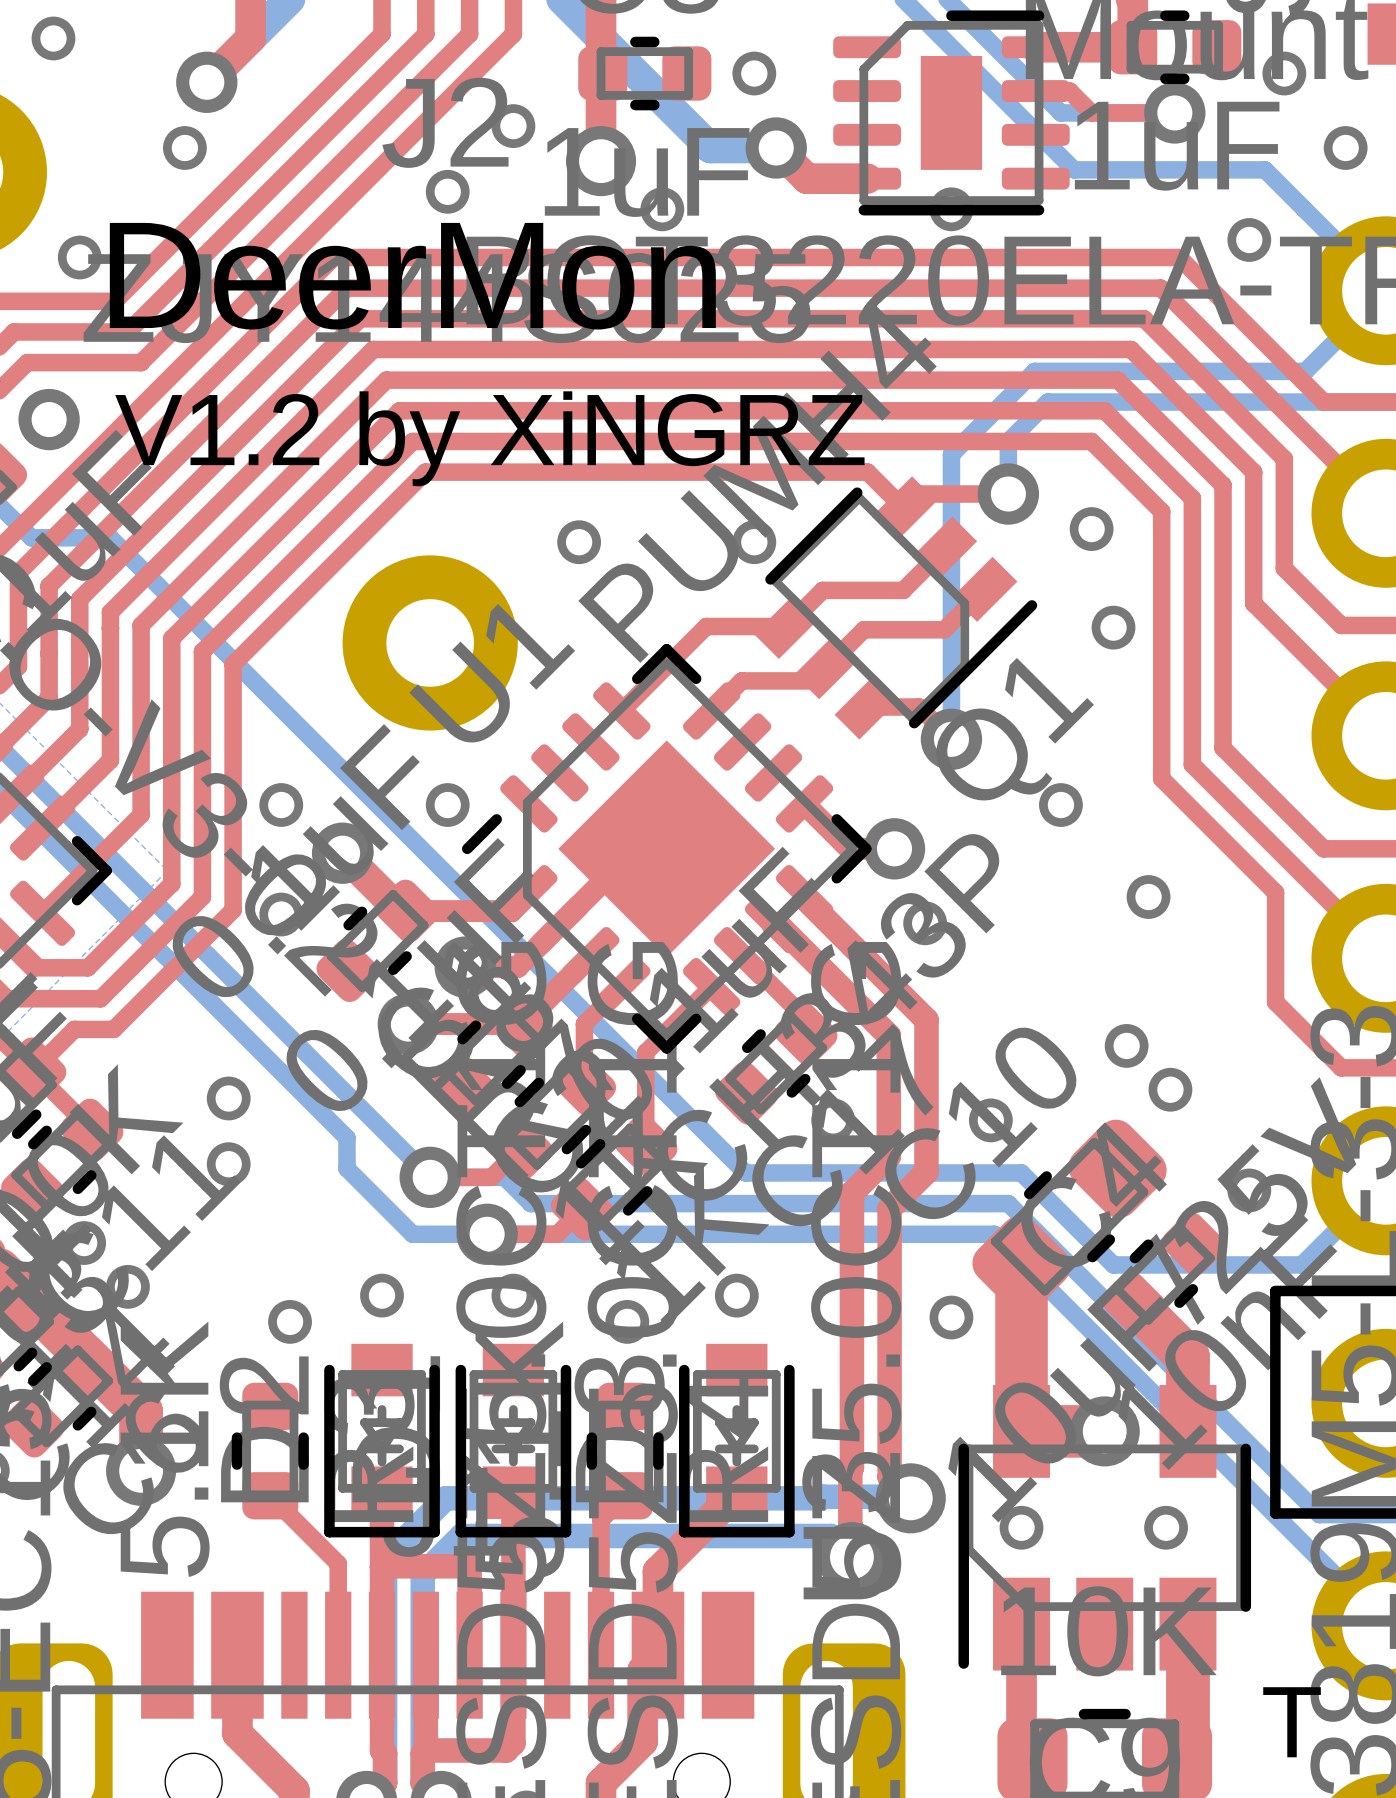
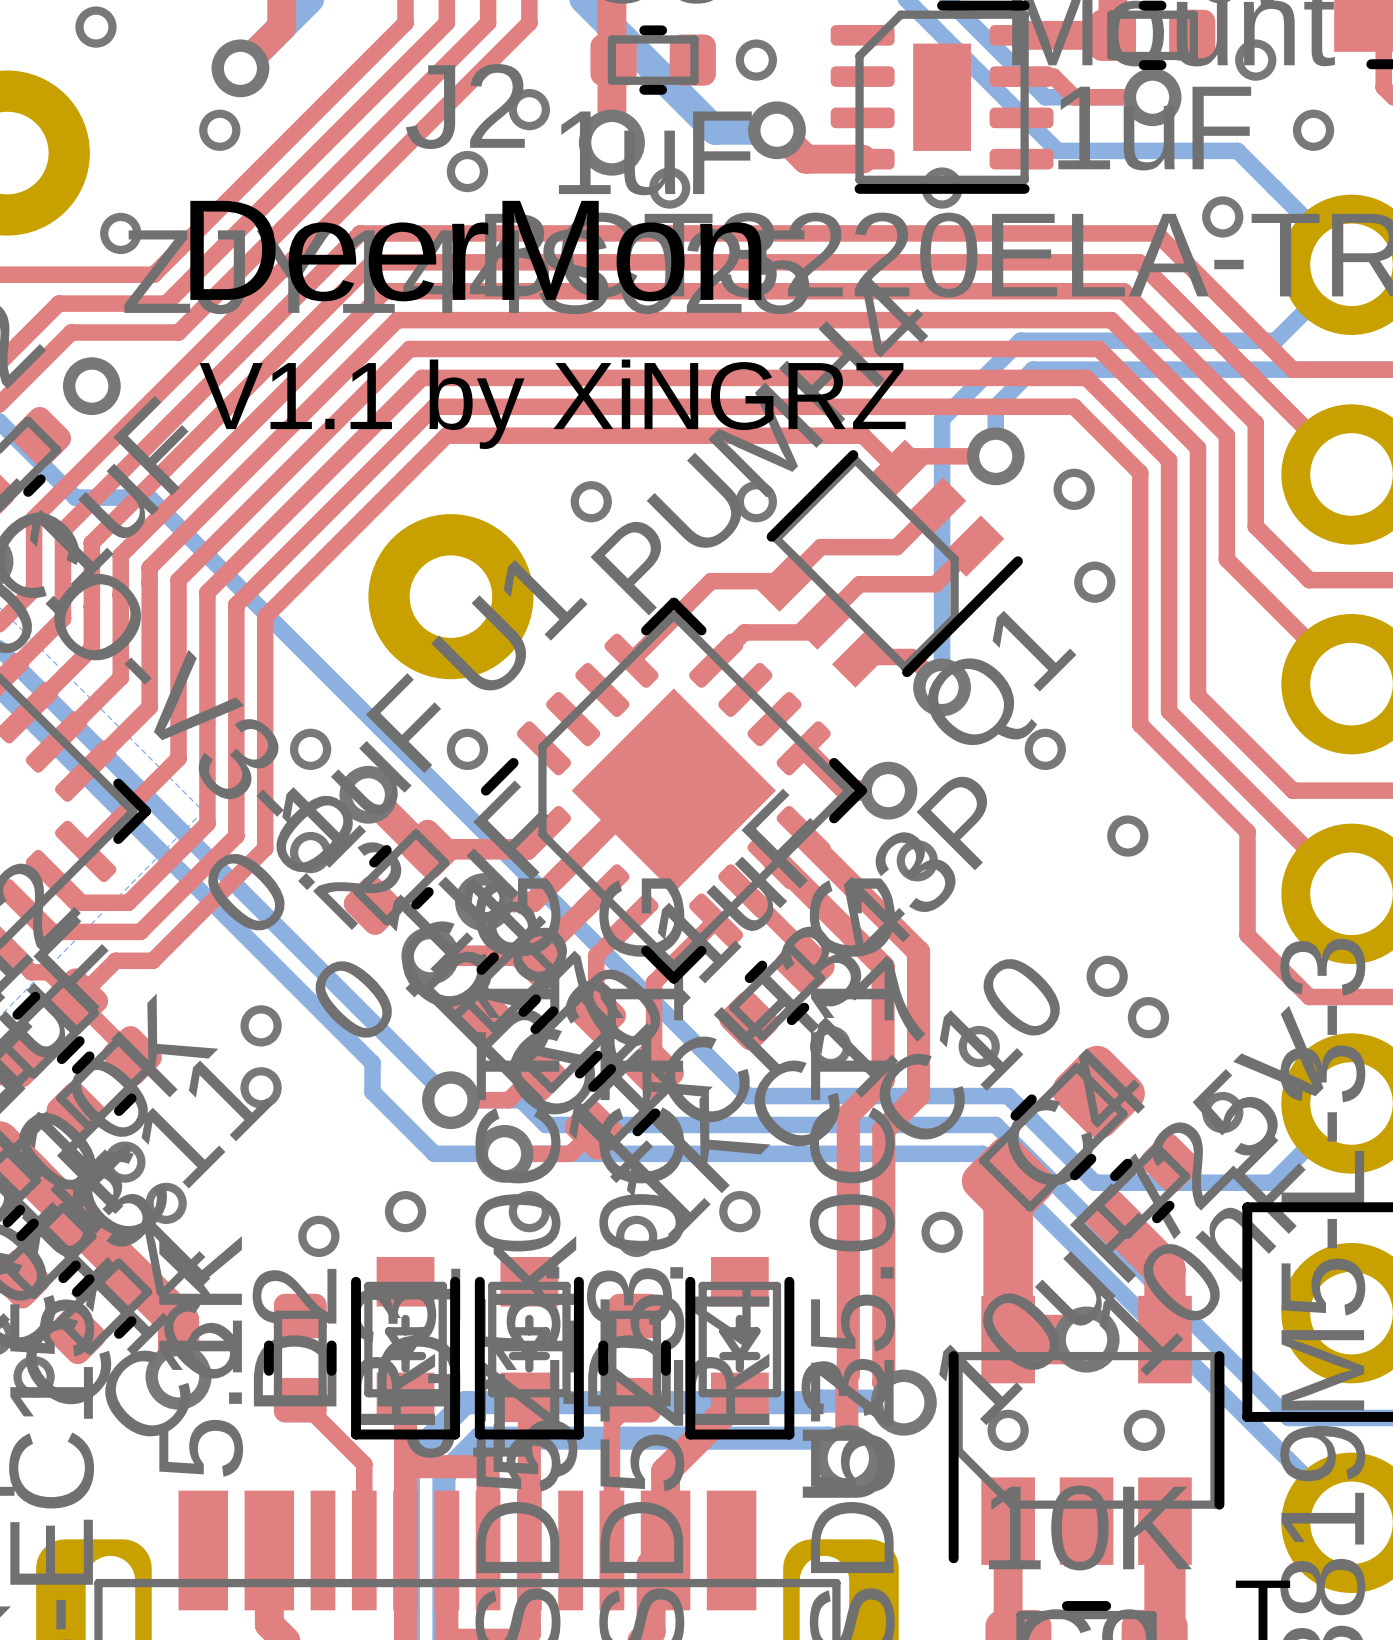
text position: DeerMon (412, 276) -> DeerMon (475, 251)
text: V1.2 by XiNGRZ (489, 438) -> V1.1 by XiNGRZ (552, 404)

